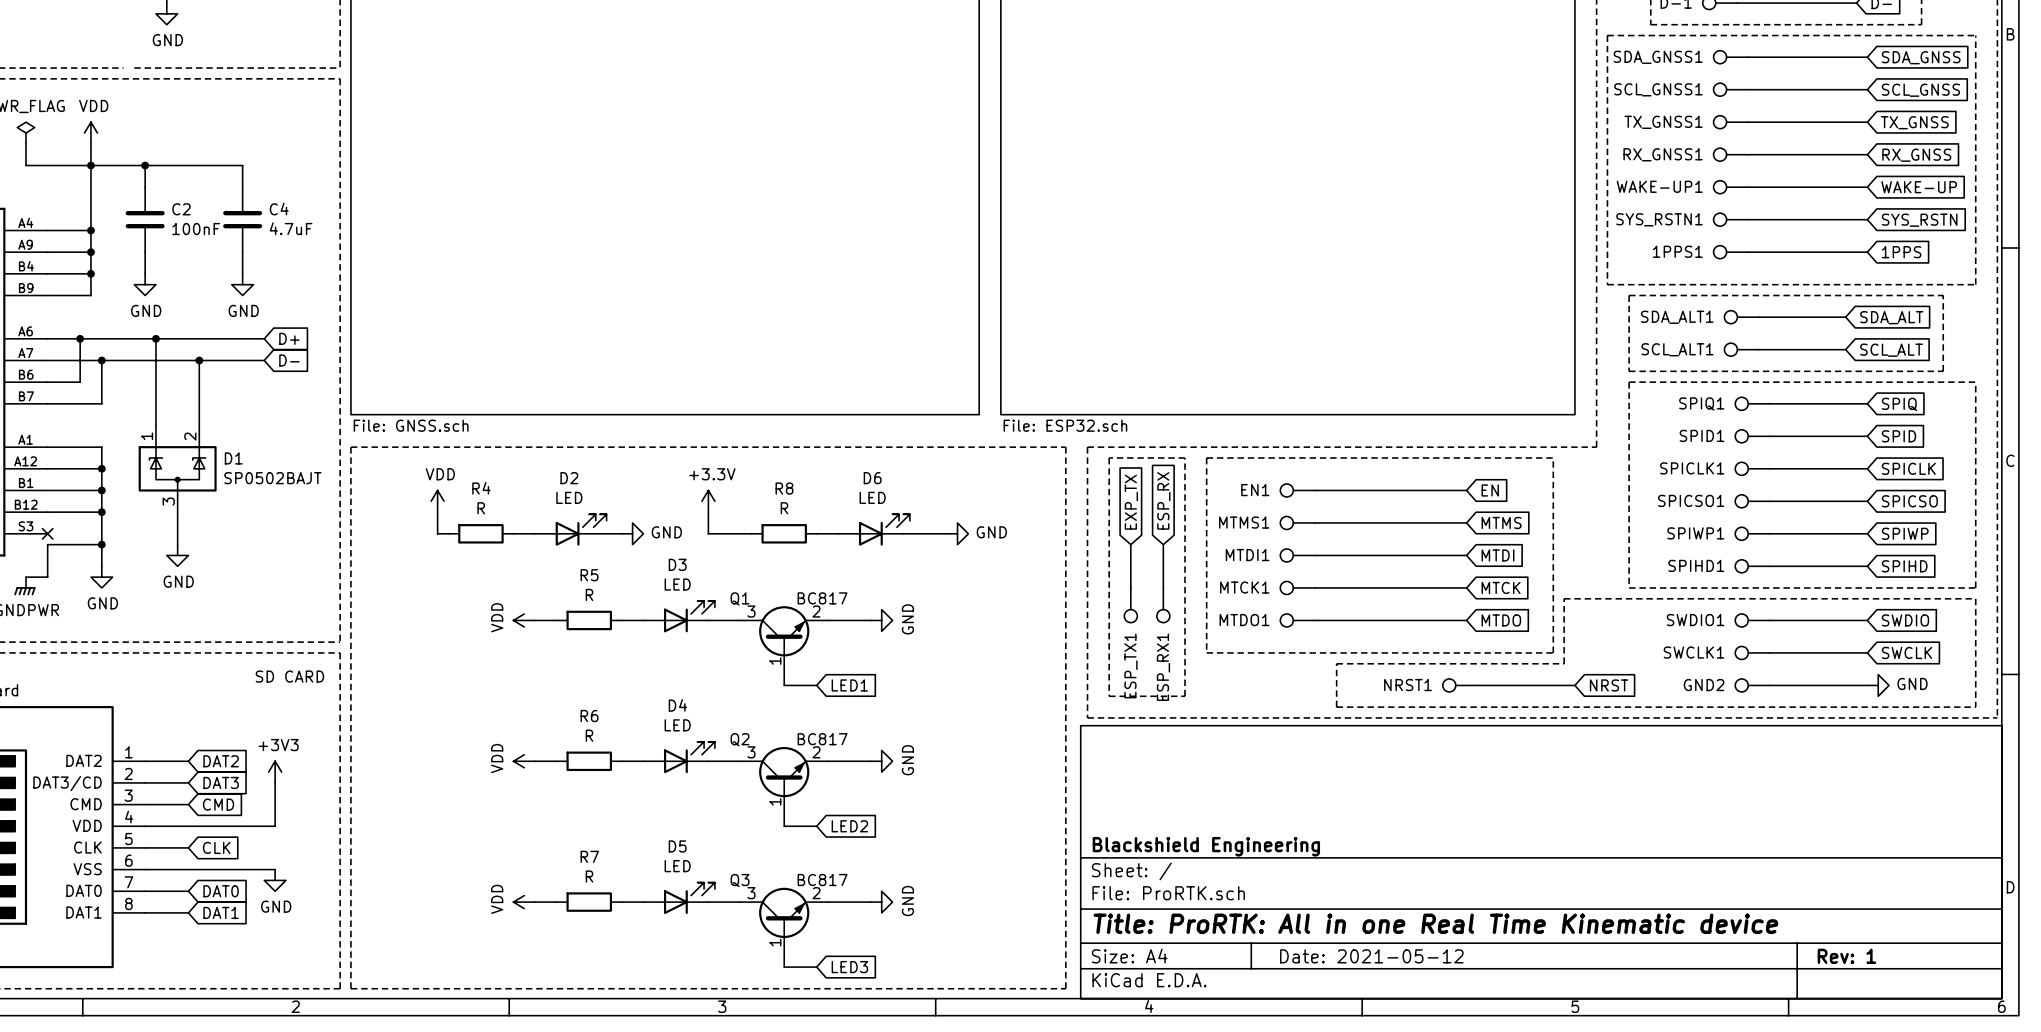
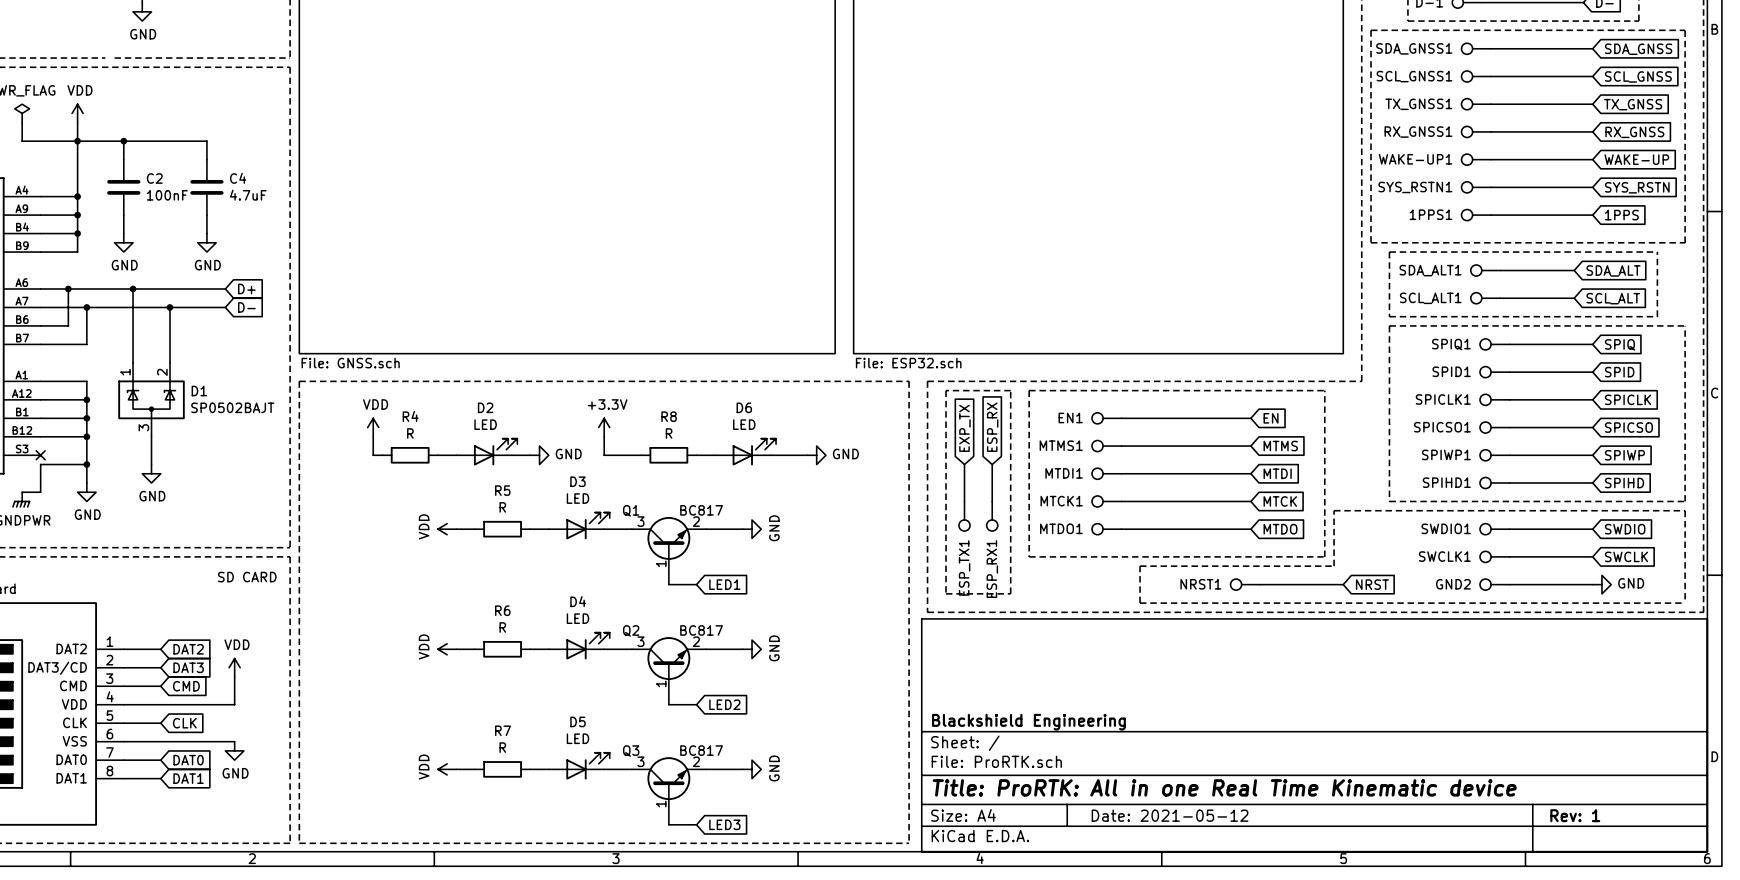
power symbol: +3V3 (275, 772) -> none
power symbol: none -> VDD (234, 667)

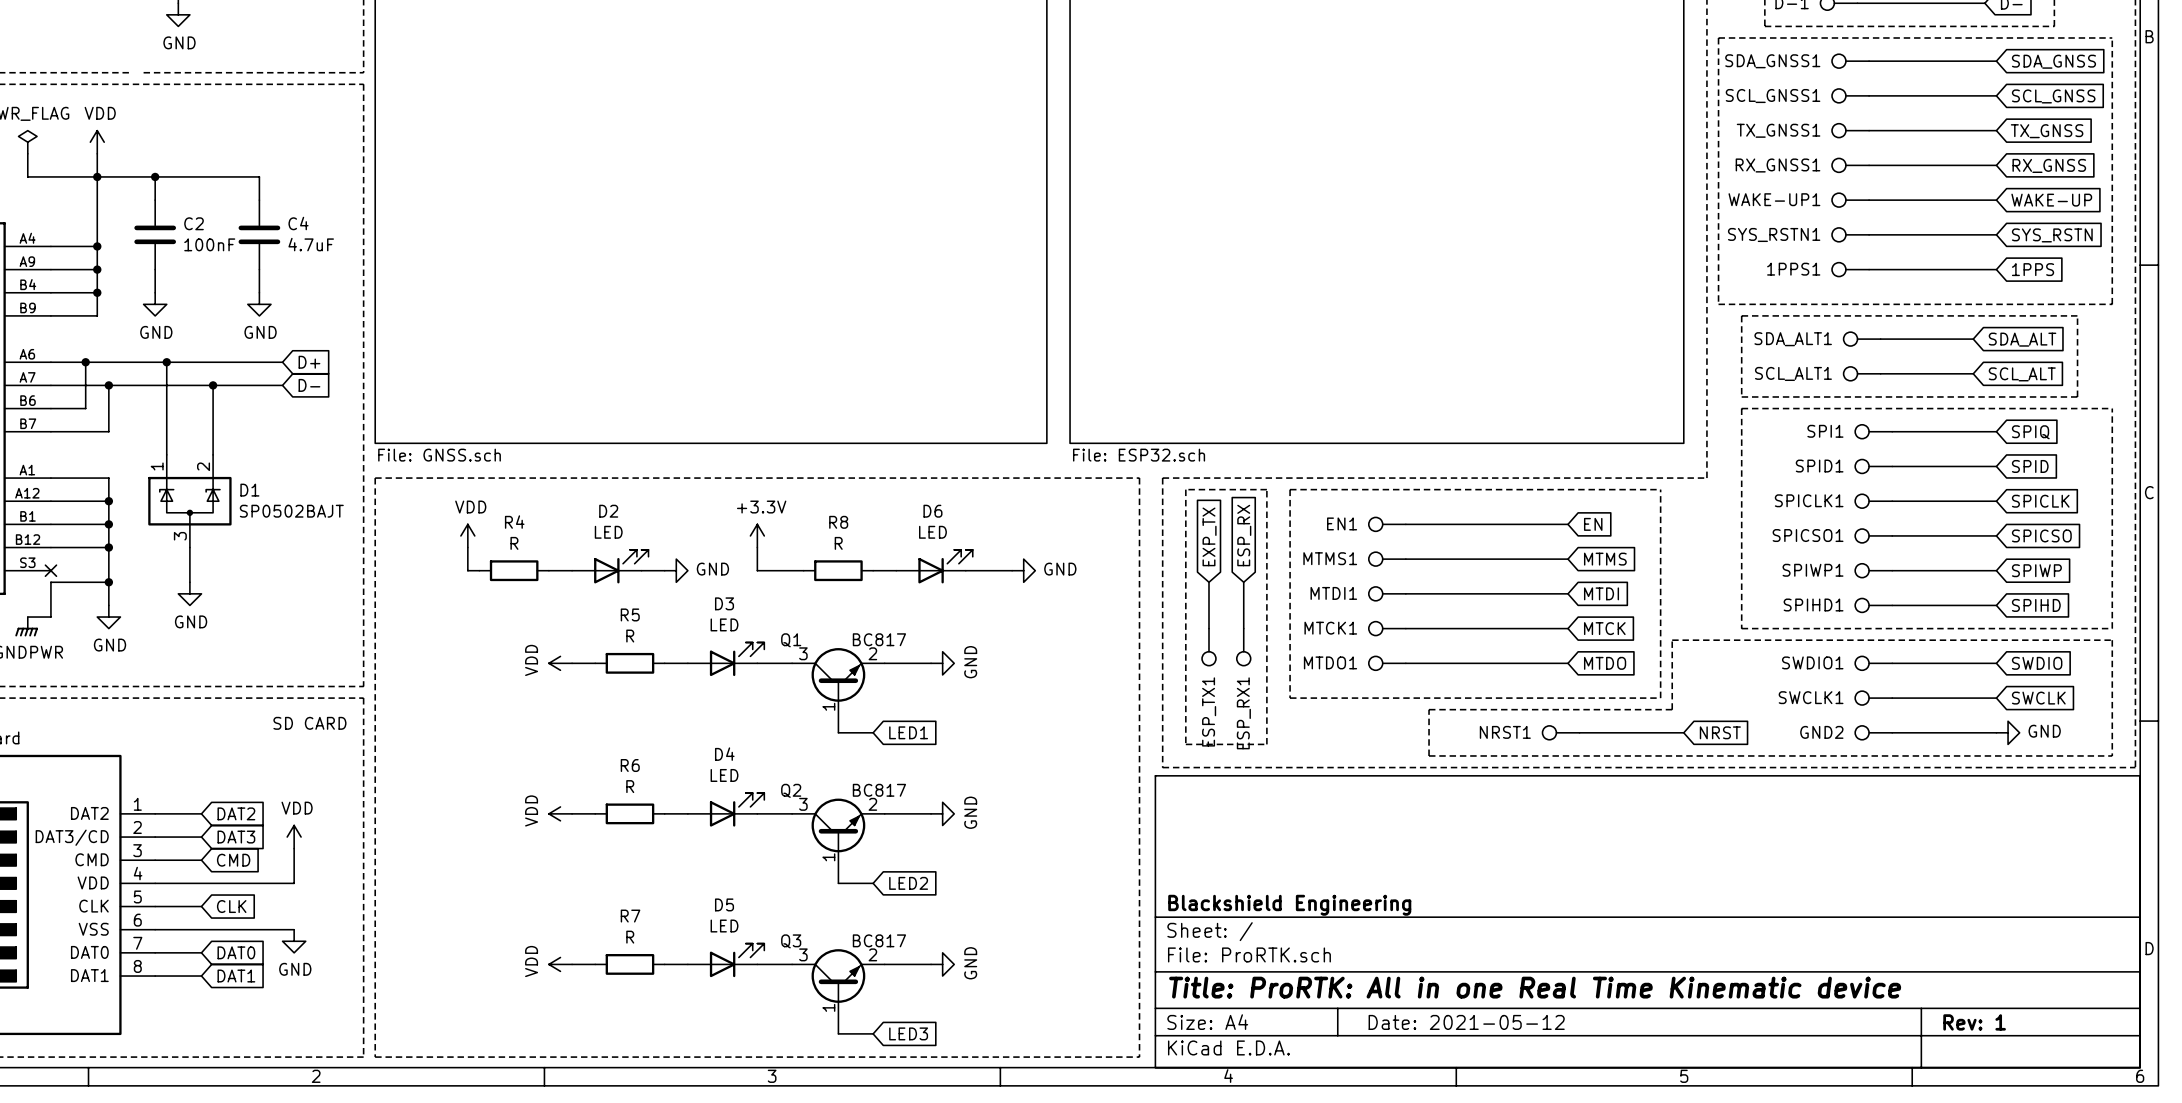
SPIQ1 name: SPIQ1 (1451, 344) -> SPI1 (1825, 431)

